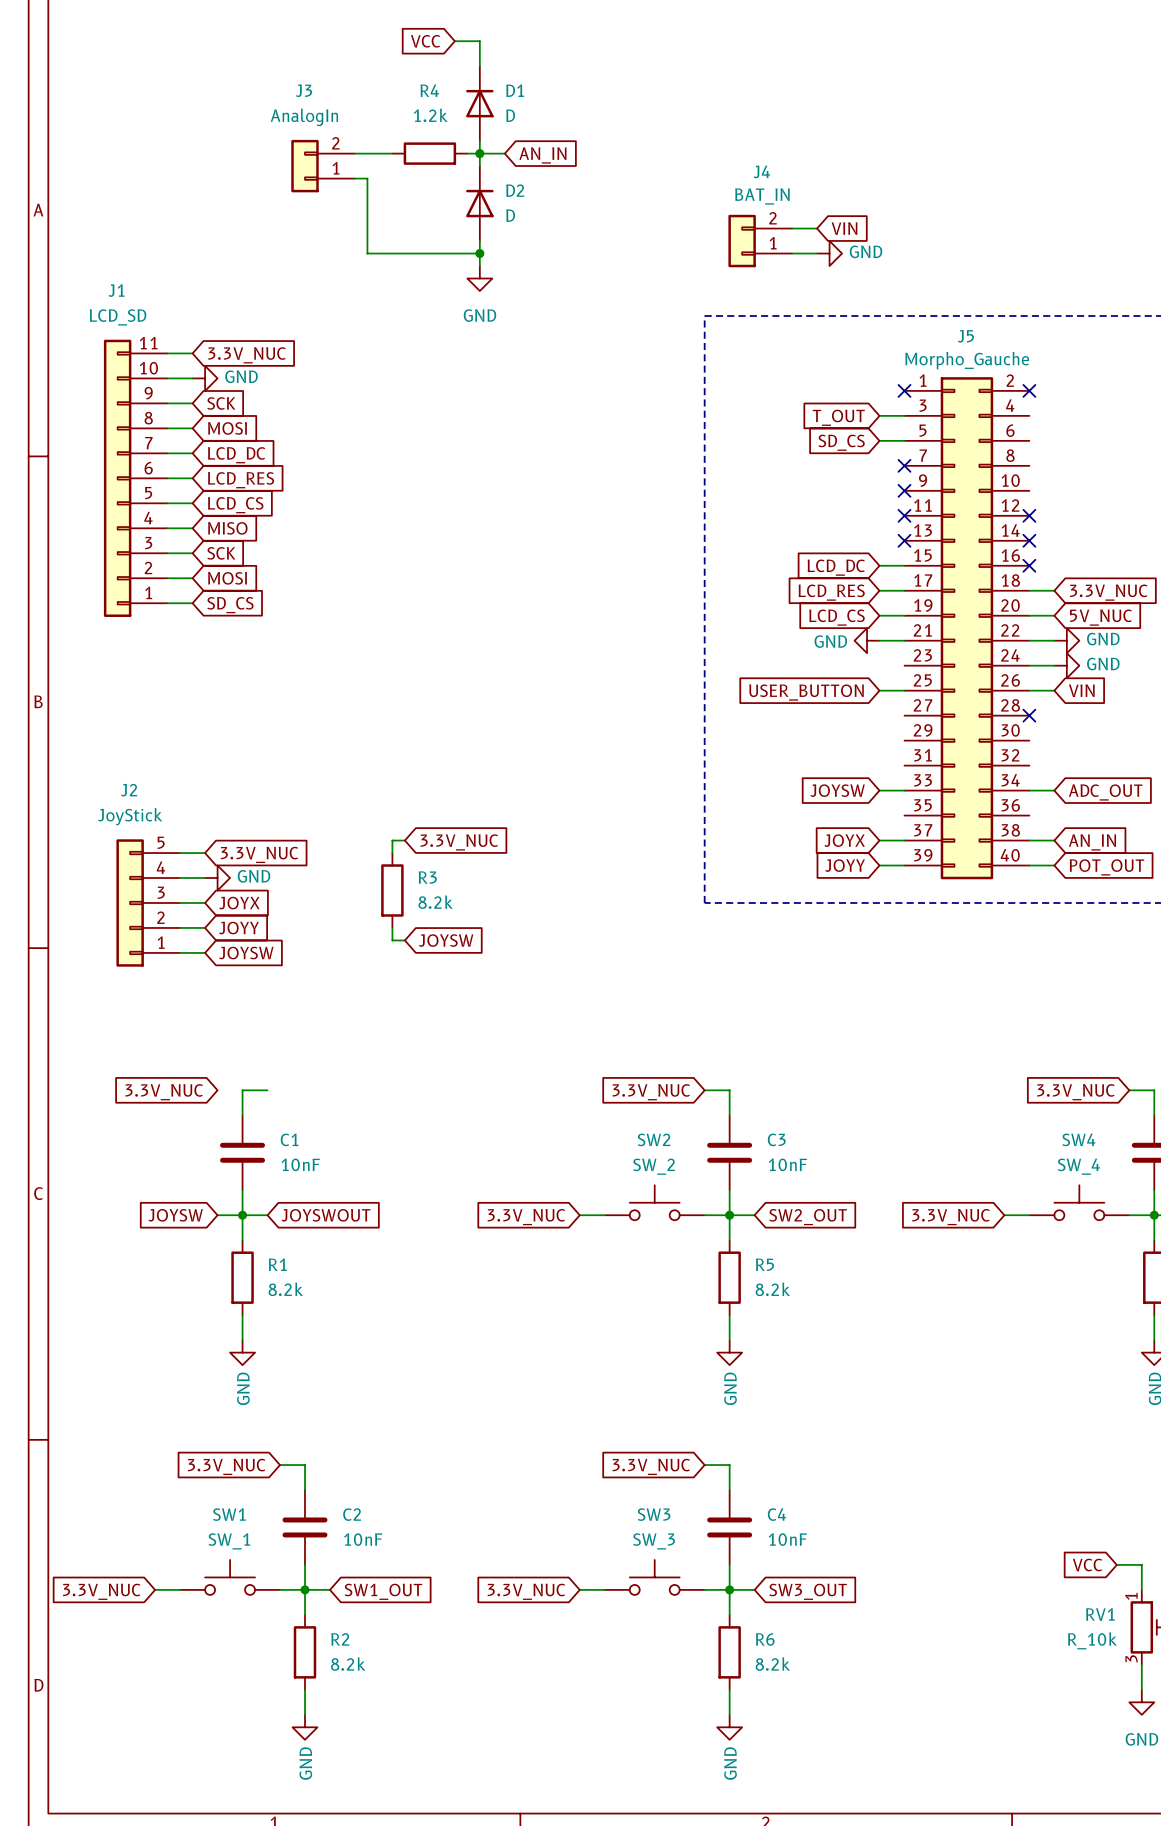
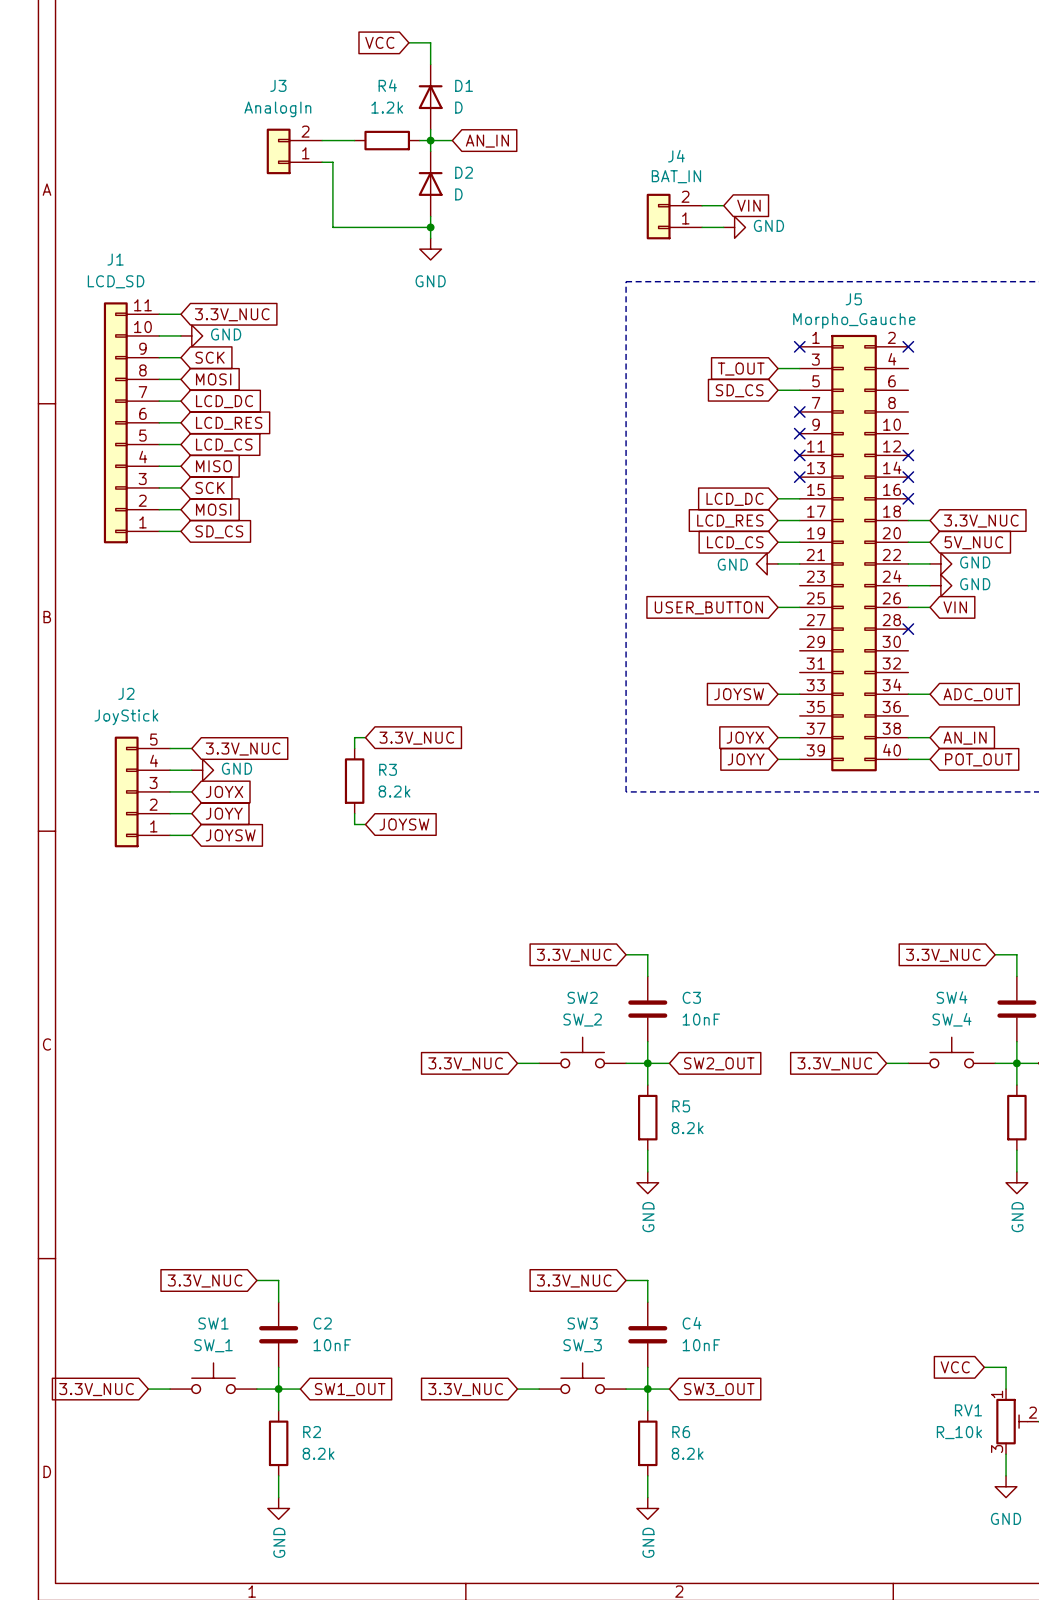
wire: (267, 1090) (242, 1090) (242, 1115) -> none
global label: 3.3V_NUC (164, 1092) -> none
C1: 10nF (242, 1152) -> none
wire: (242, 1190) (242, 1240) -> none
global label: JOYSW (175, 1215) -> none
wire: (217, 1215) (267, 1215) -> none
junction: (242, 1215) -> none
global label: JOYSWOUT (326, 1215) -> none
R1: 8.2k (242, 1277) -> none
wire: (242, 1315) (242, 1340) -> none
power symbol: GND (242, 1352) -> none

